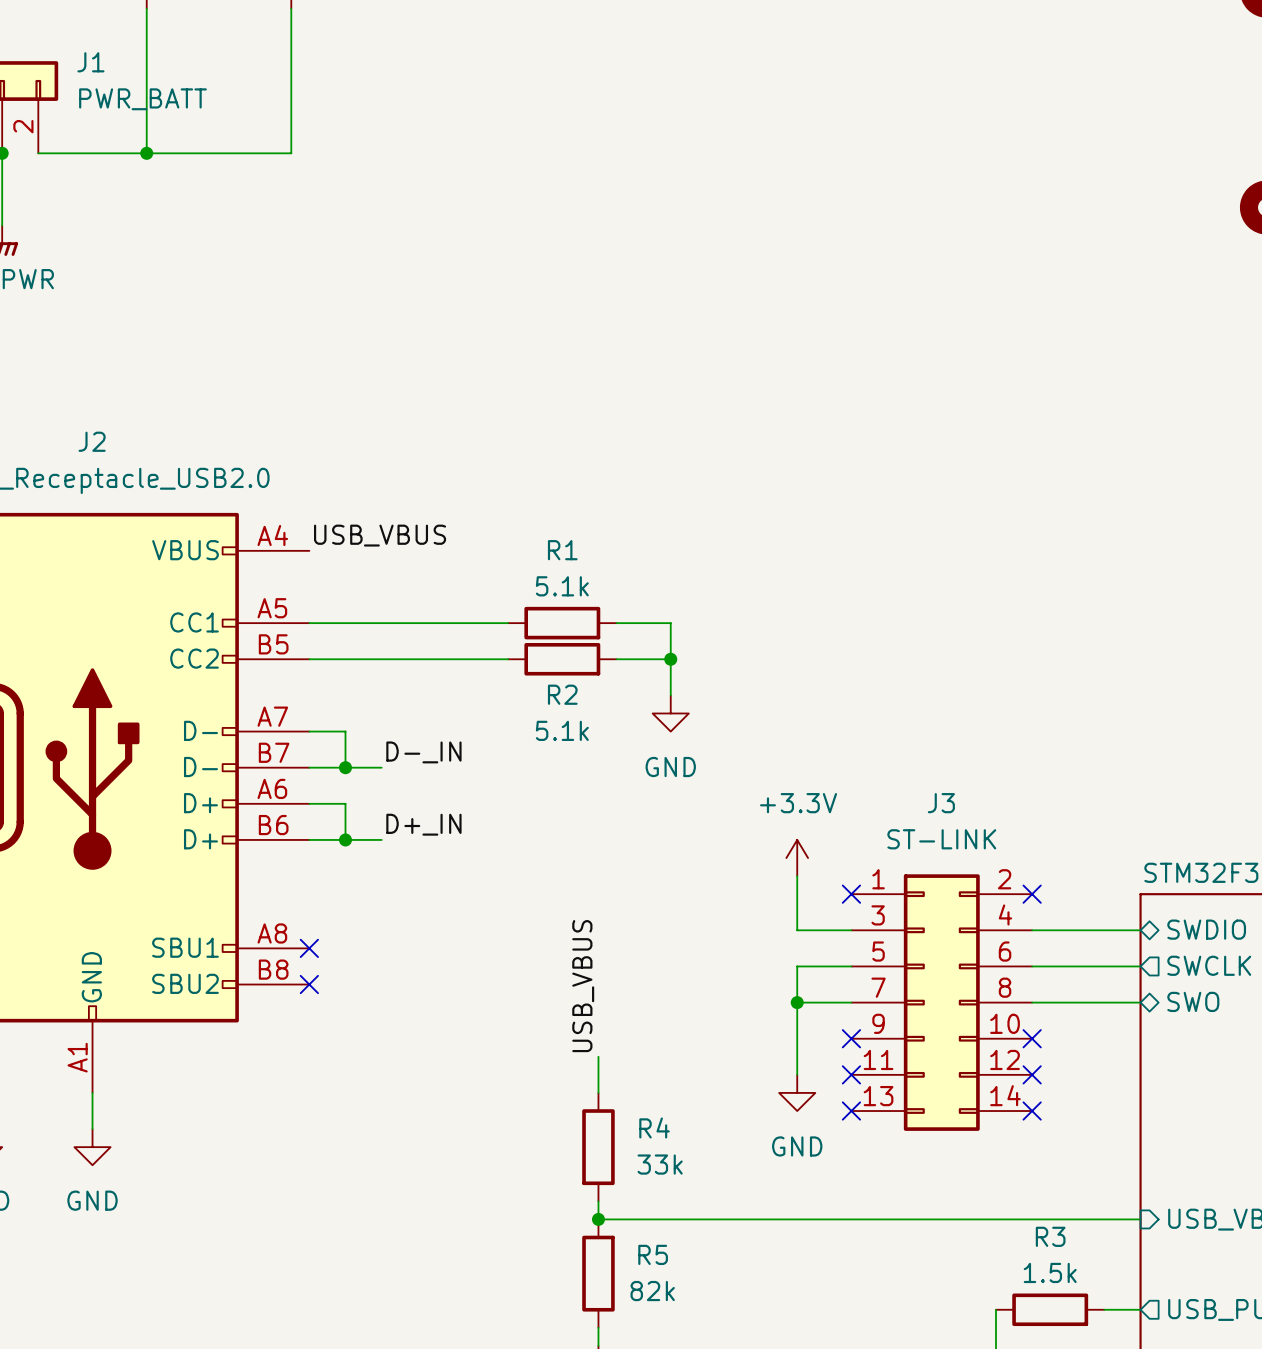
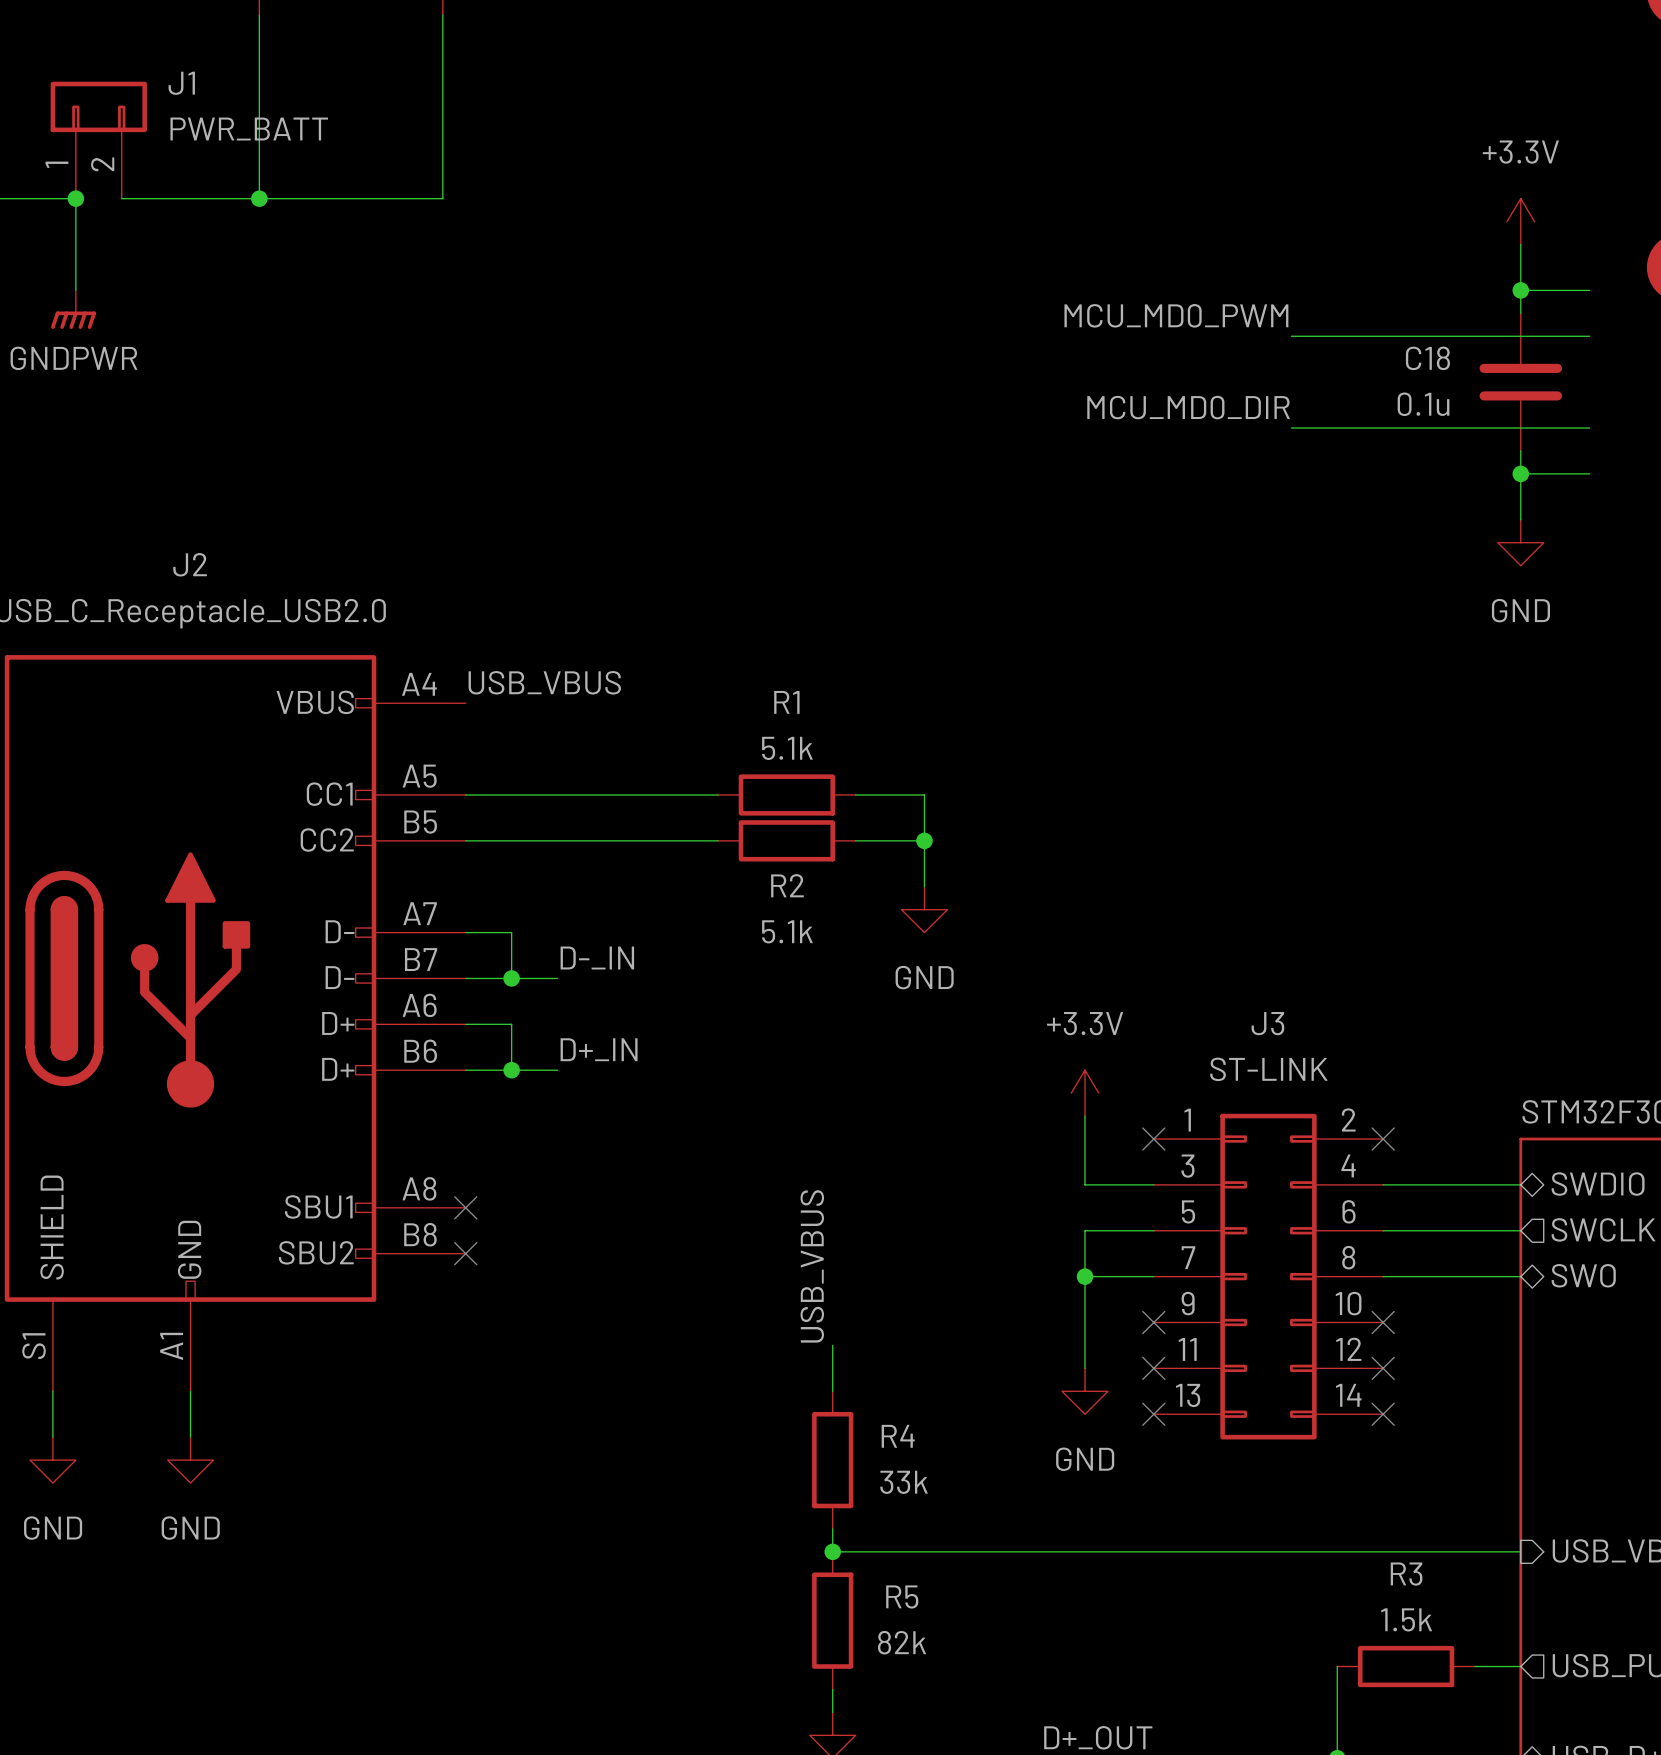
power symbol: none -> +3.3V (1520, 221)
wire: none -> (1520, 244) (1520, 313)
wire: none -> (1520, 290) (1589, 290)
junction: none -> (1520, 290)
label: none -> MCU_MD0_PWM (1176, 315)
wire: none -> (1291, 336) (1589, 336)
C18: none -> 0.1u (1520, 382)
label: none -> MCU_MD0_DIR (1188, 407)
wire: none -> (1291, 428) (1589, 428)
wire: none -> (1520, 450) (1520, 519)
wire: none -> (1520, 473) (1589, 473)
junction: none -> (1520, 473)
power symbol: none -> GND (1520, 542)

